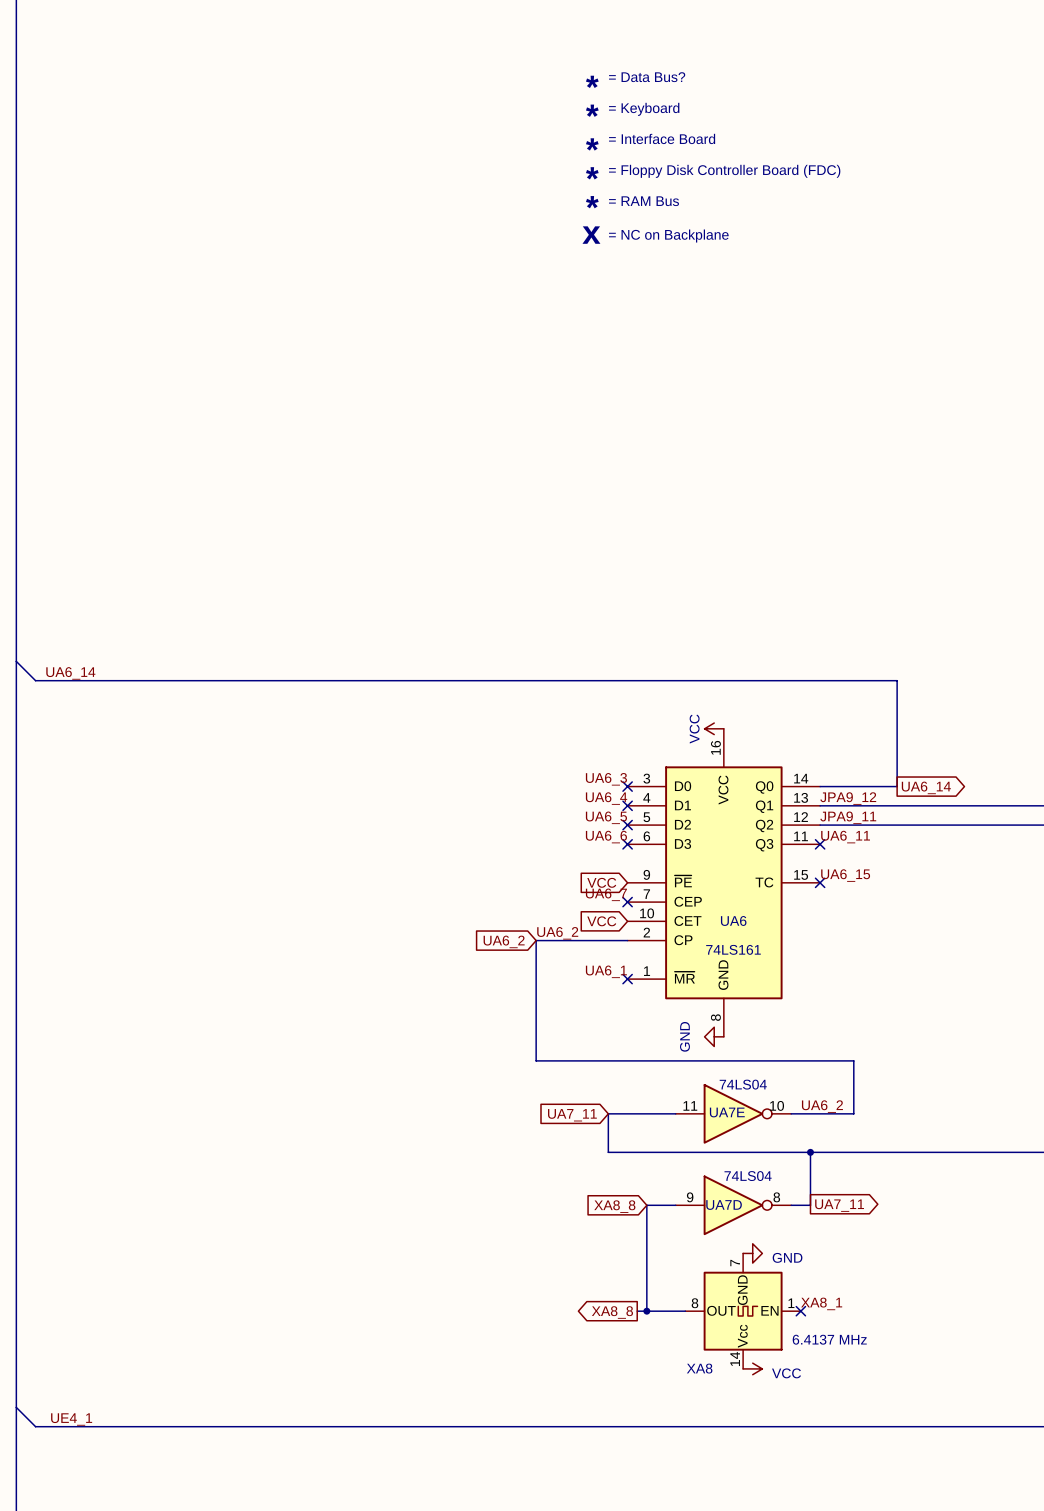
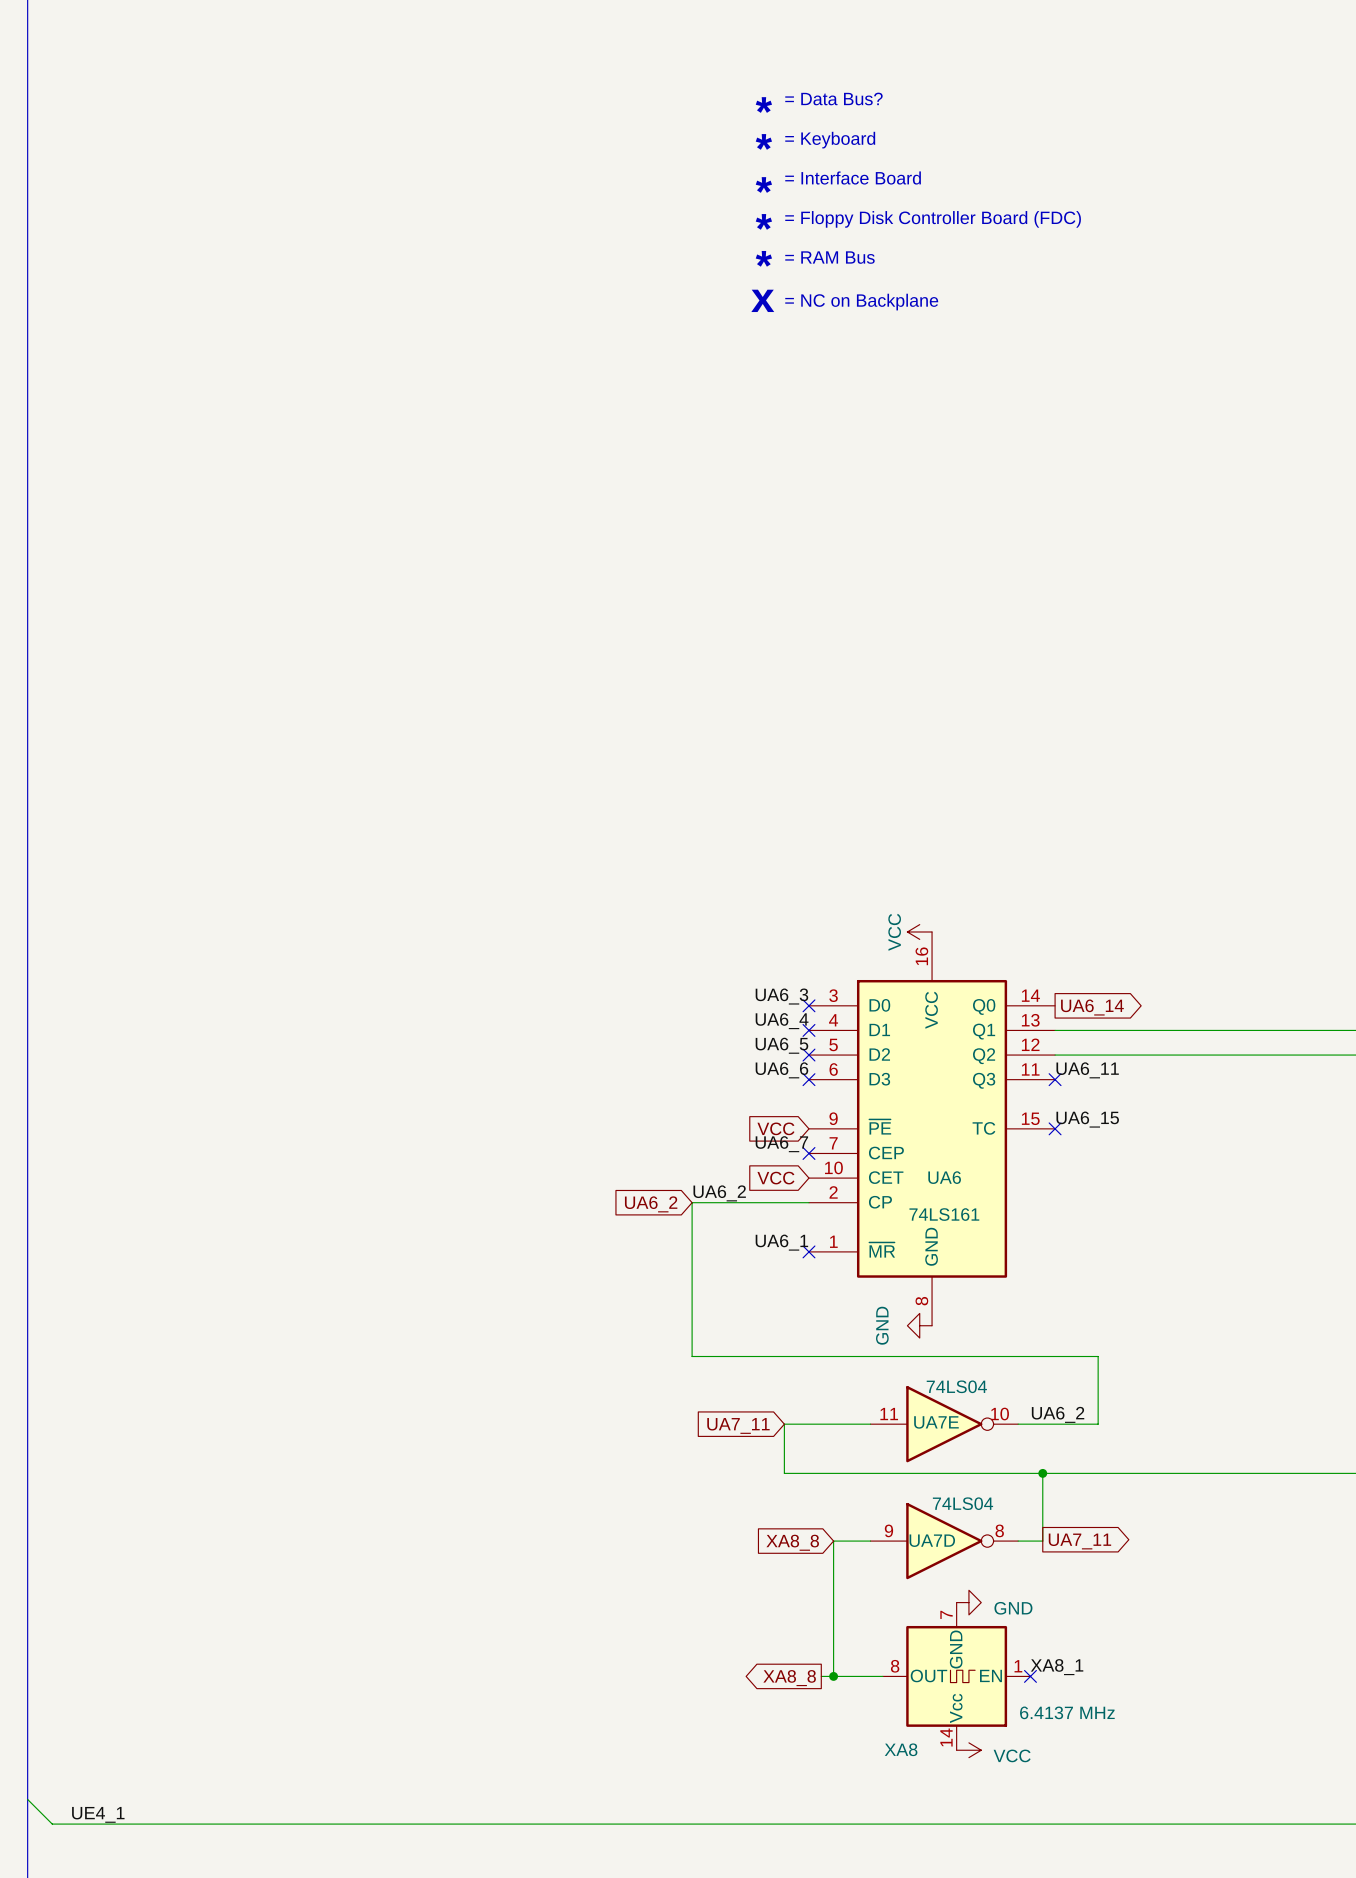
wire: (16, 661) (35, 680) (897, 680) (897, 786) (820, 786) -> none
label: UA6_14 (70, 673) -> none
global label position: UA6_14 (926, 787) -> UA6_14 (1092, 1007)
label: JPA9_12 (848, 798) -> none
label: JPA9_11 (848, 817) -> none

